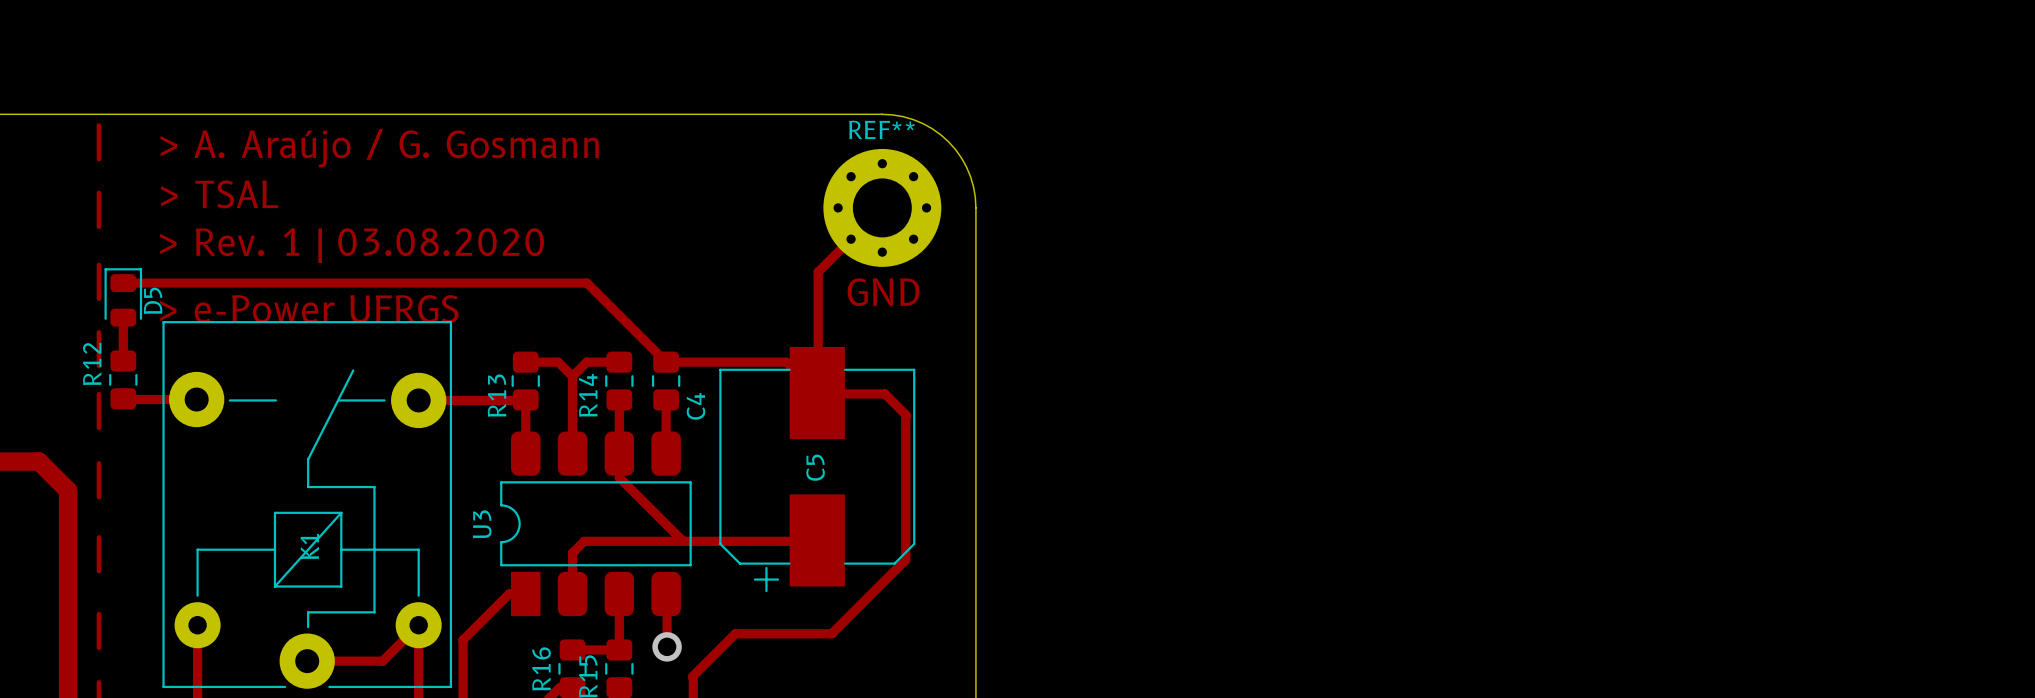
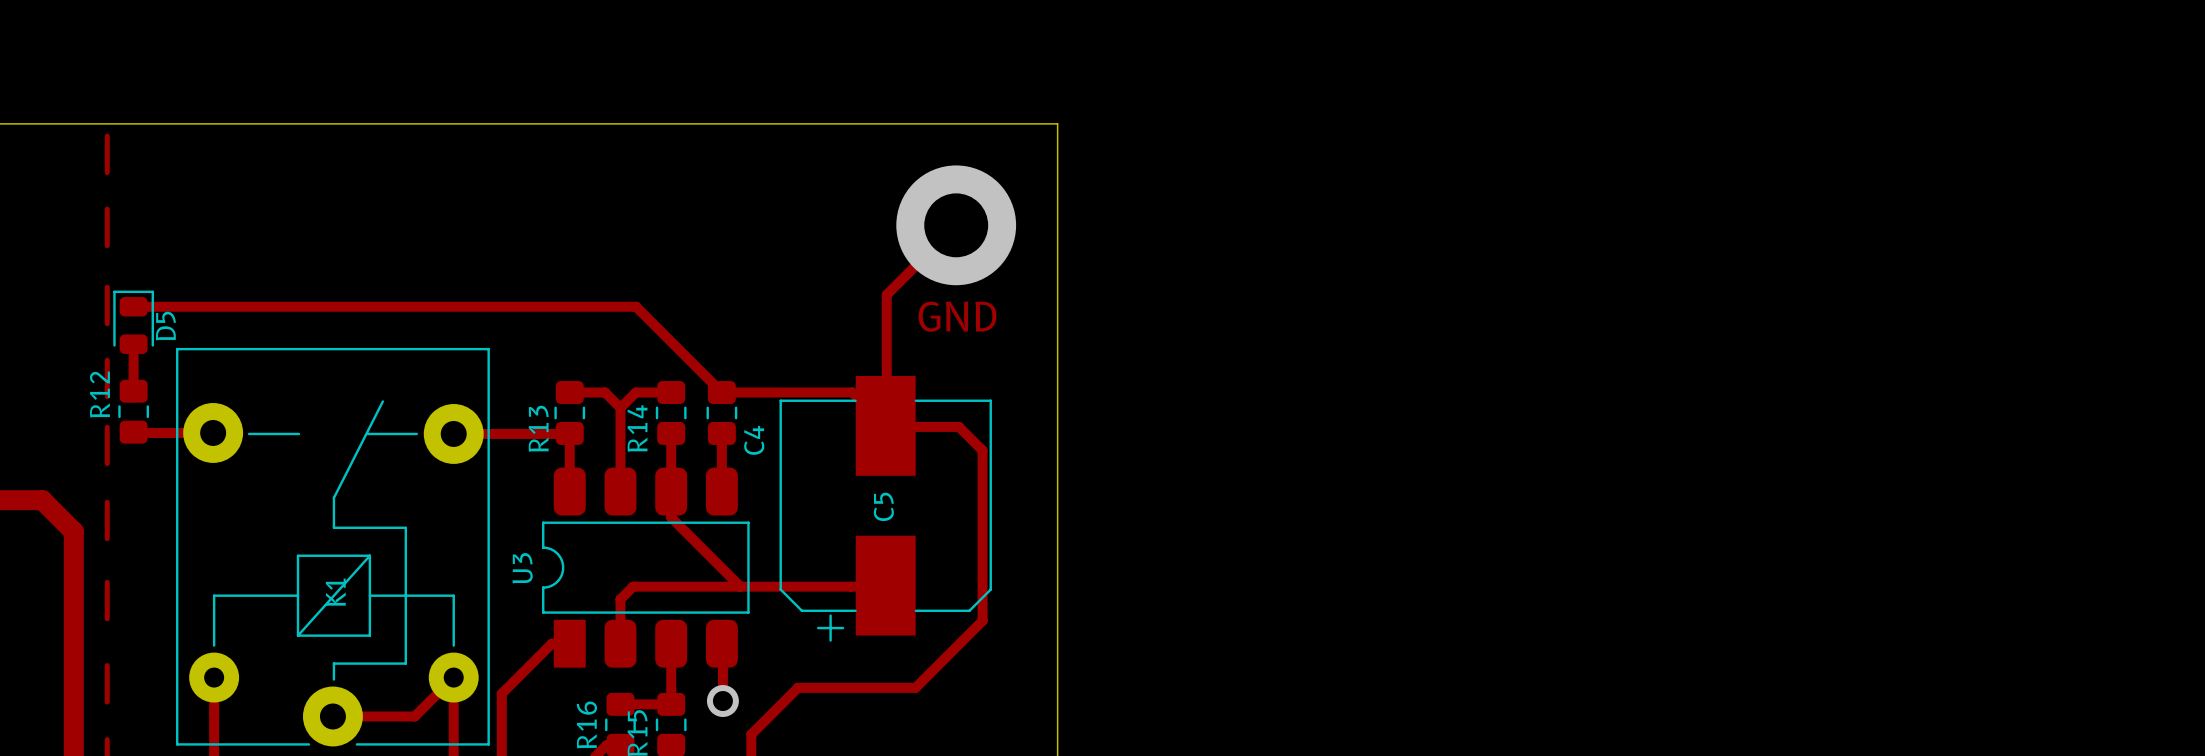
board edge: (882, 114) (913, 119) (932, 128) (948, 141) (966, 167) (973, 187) (975, 207) -> (956, 123) (1057, 123) (1057, 225)
text: > A. Araújo / G. Gosmann (379, 148) -> none
text: > TSAL (219, 194) -> none
REF**: (882, 207) -> none
via: none -> (956, 225)
text: > Rev. 1 | 03.08.2020 (352, 245) -> none
text: > e-Power UFRGS (309, 309) -> none
track: (905, 414) (905, 559) (831, 633) (735, 633) (692, 676) -> none
track: none -> (982, 450) (982, 620) (915, 687) (797, 687) (751, 734)

